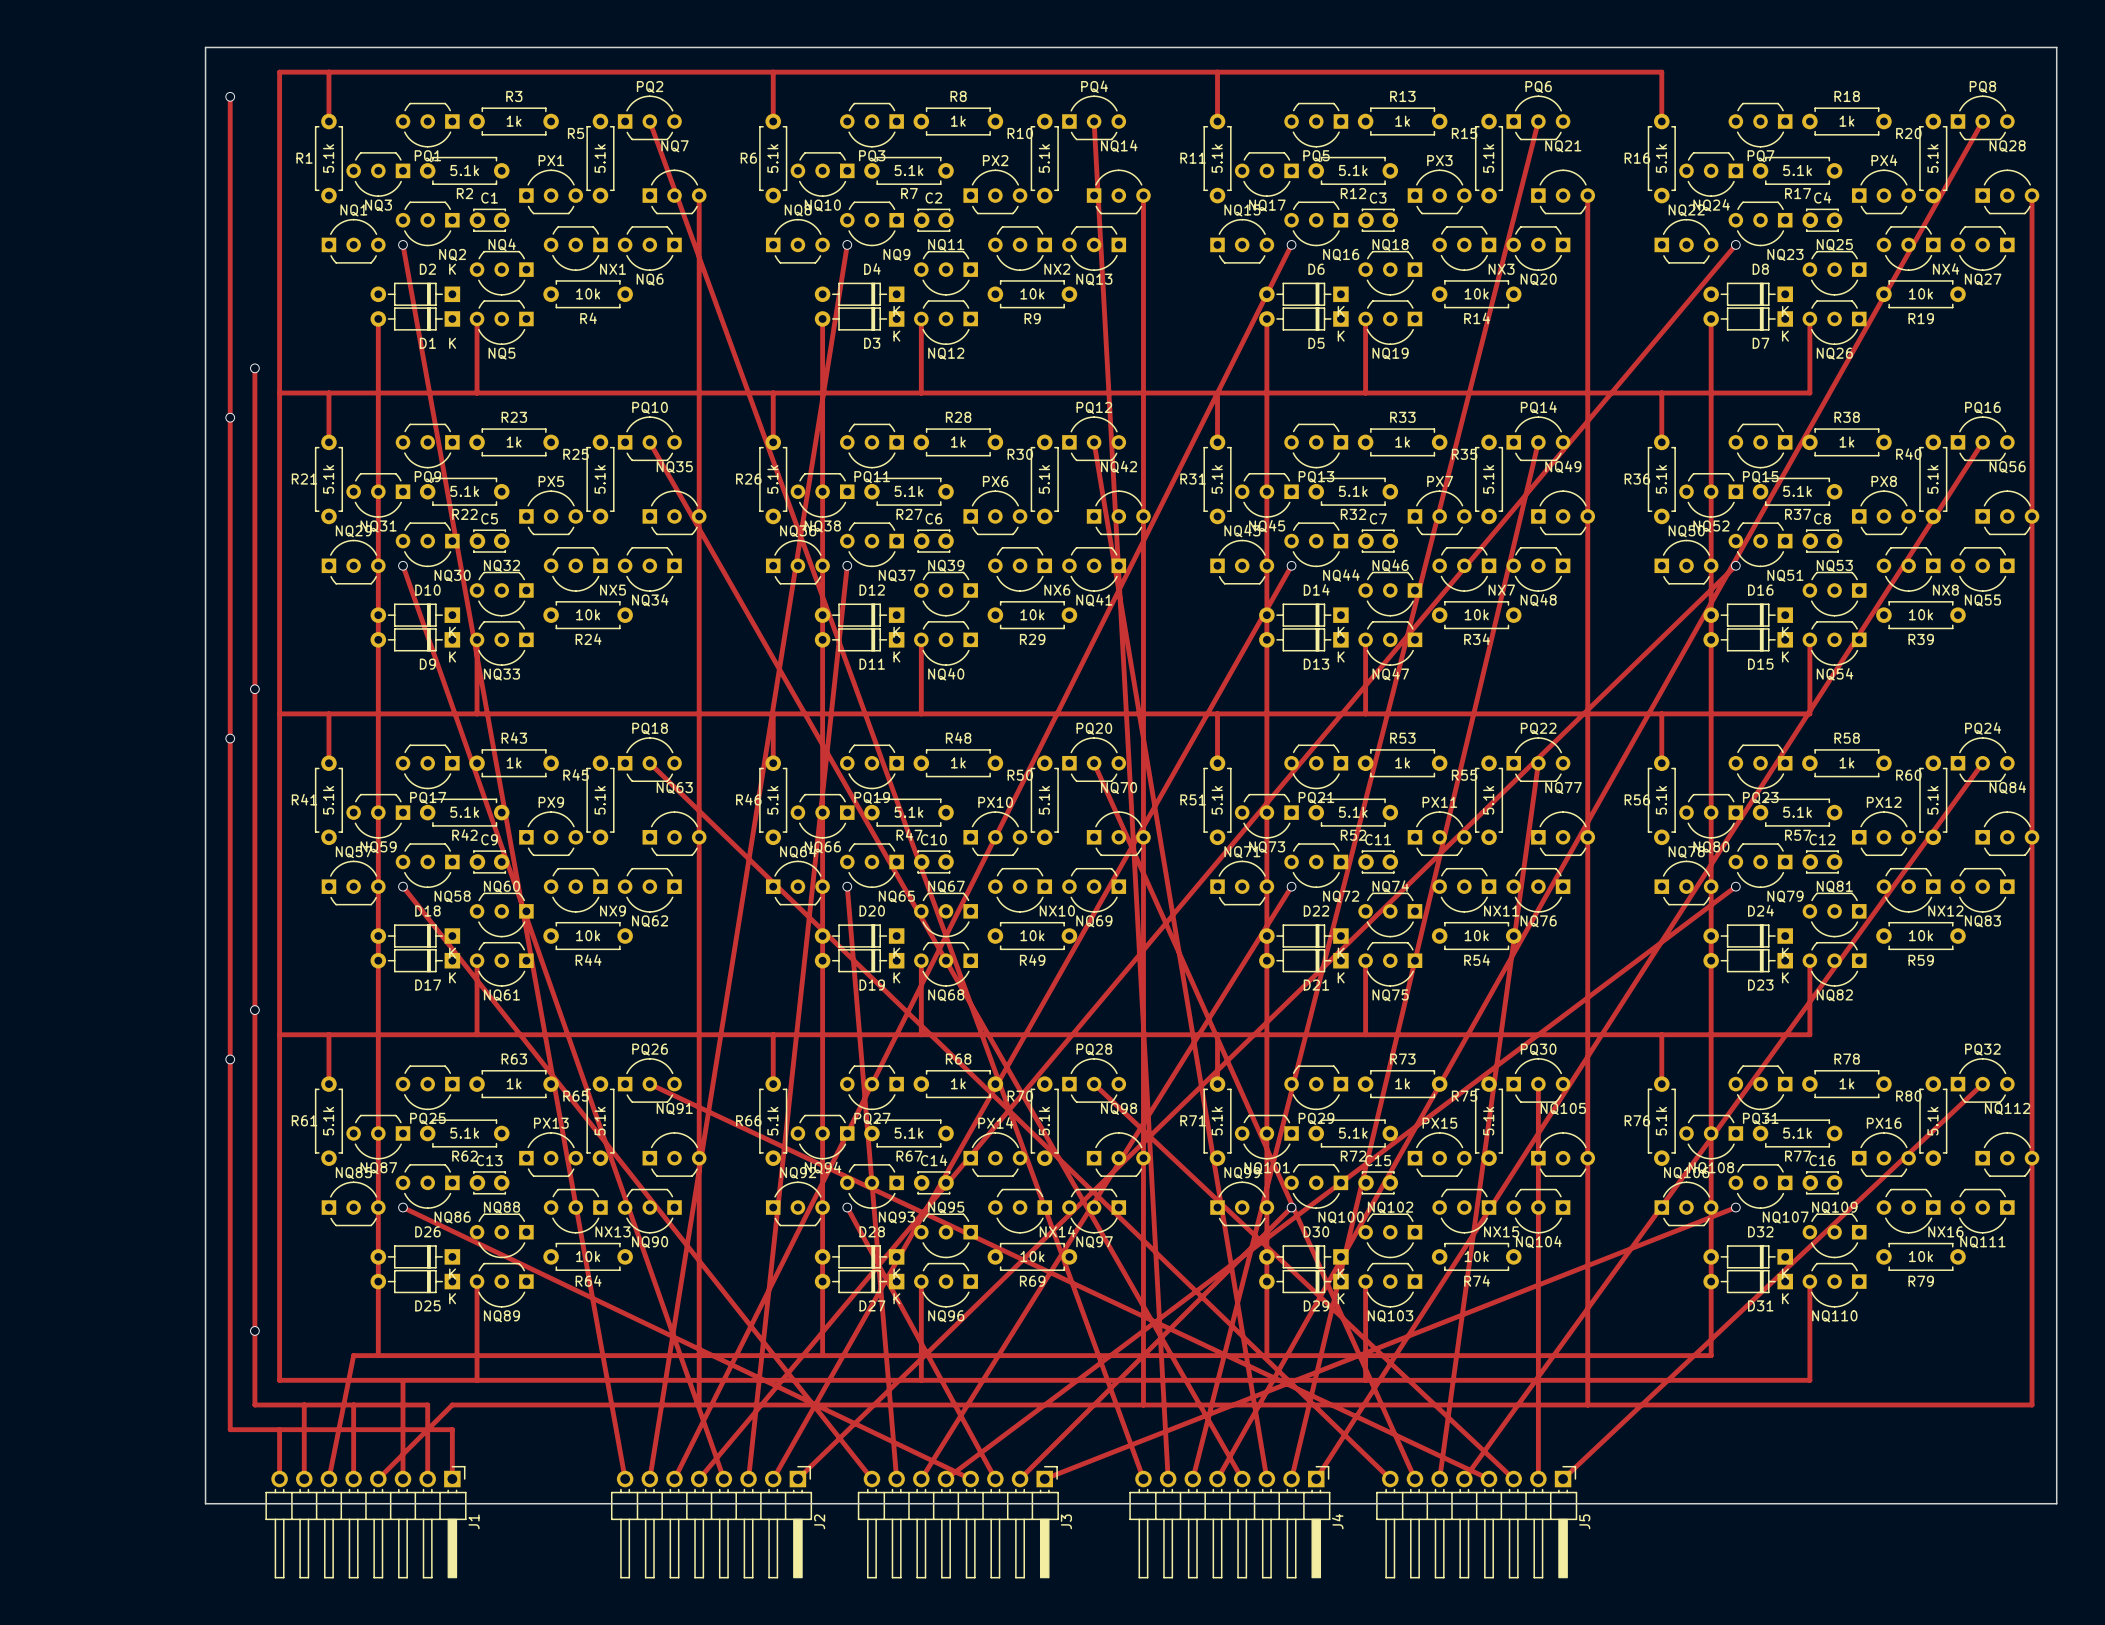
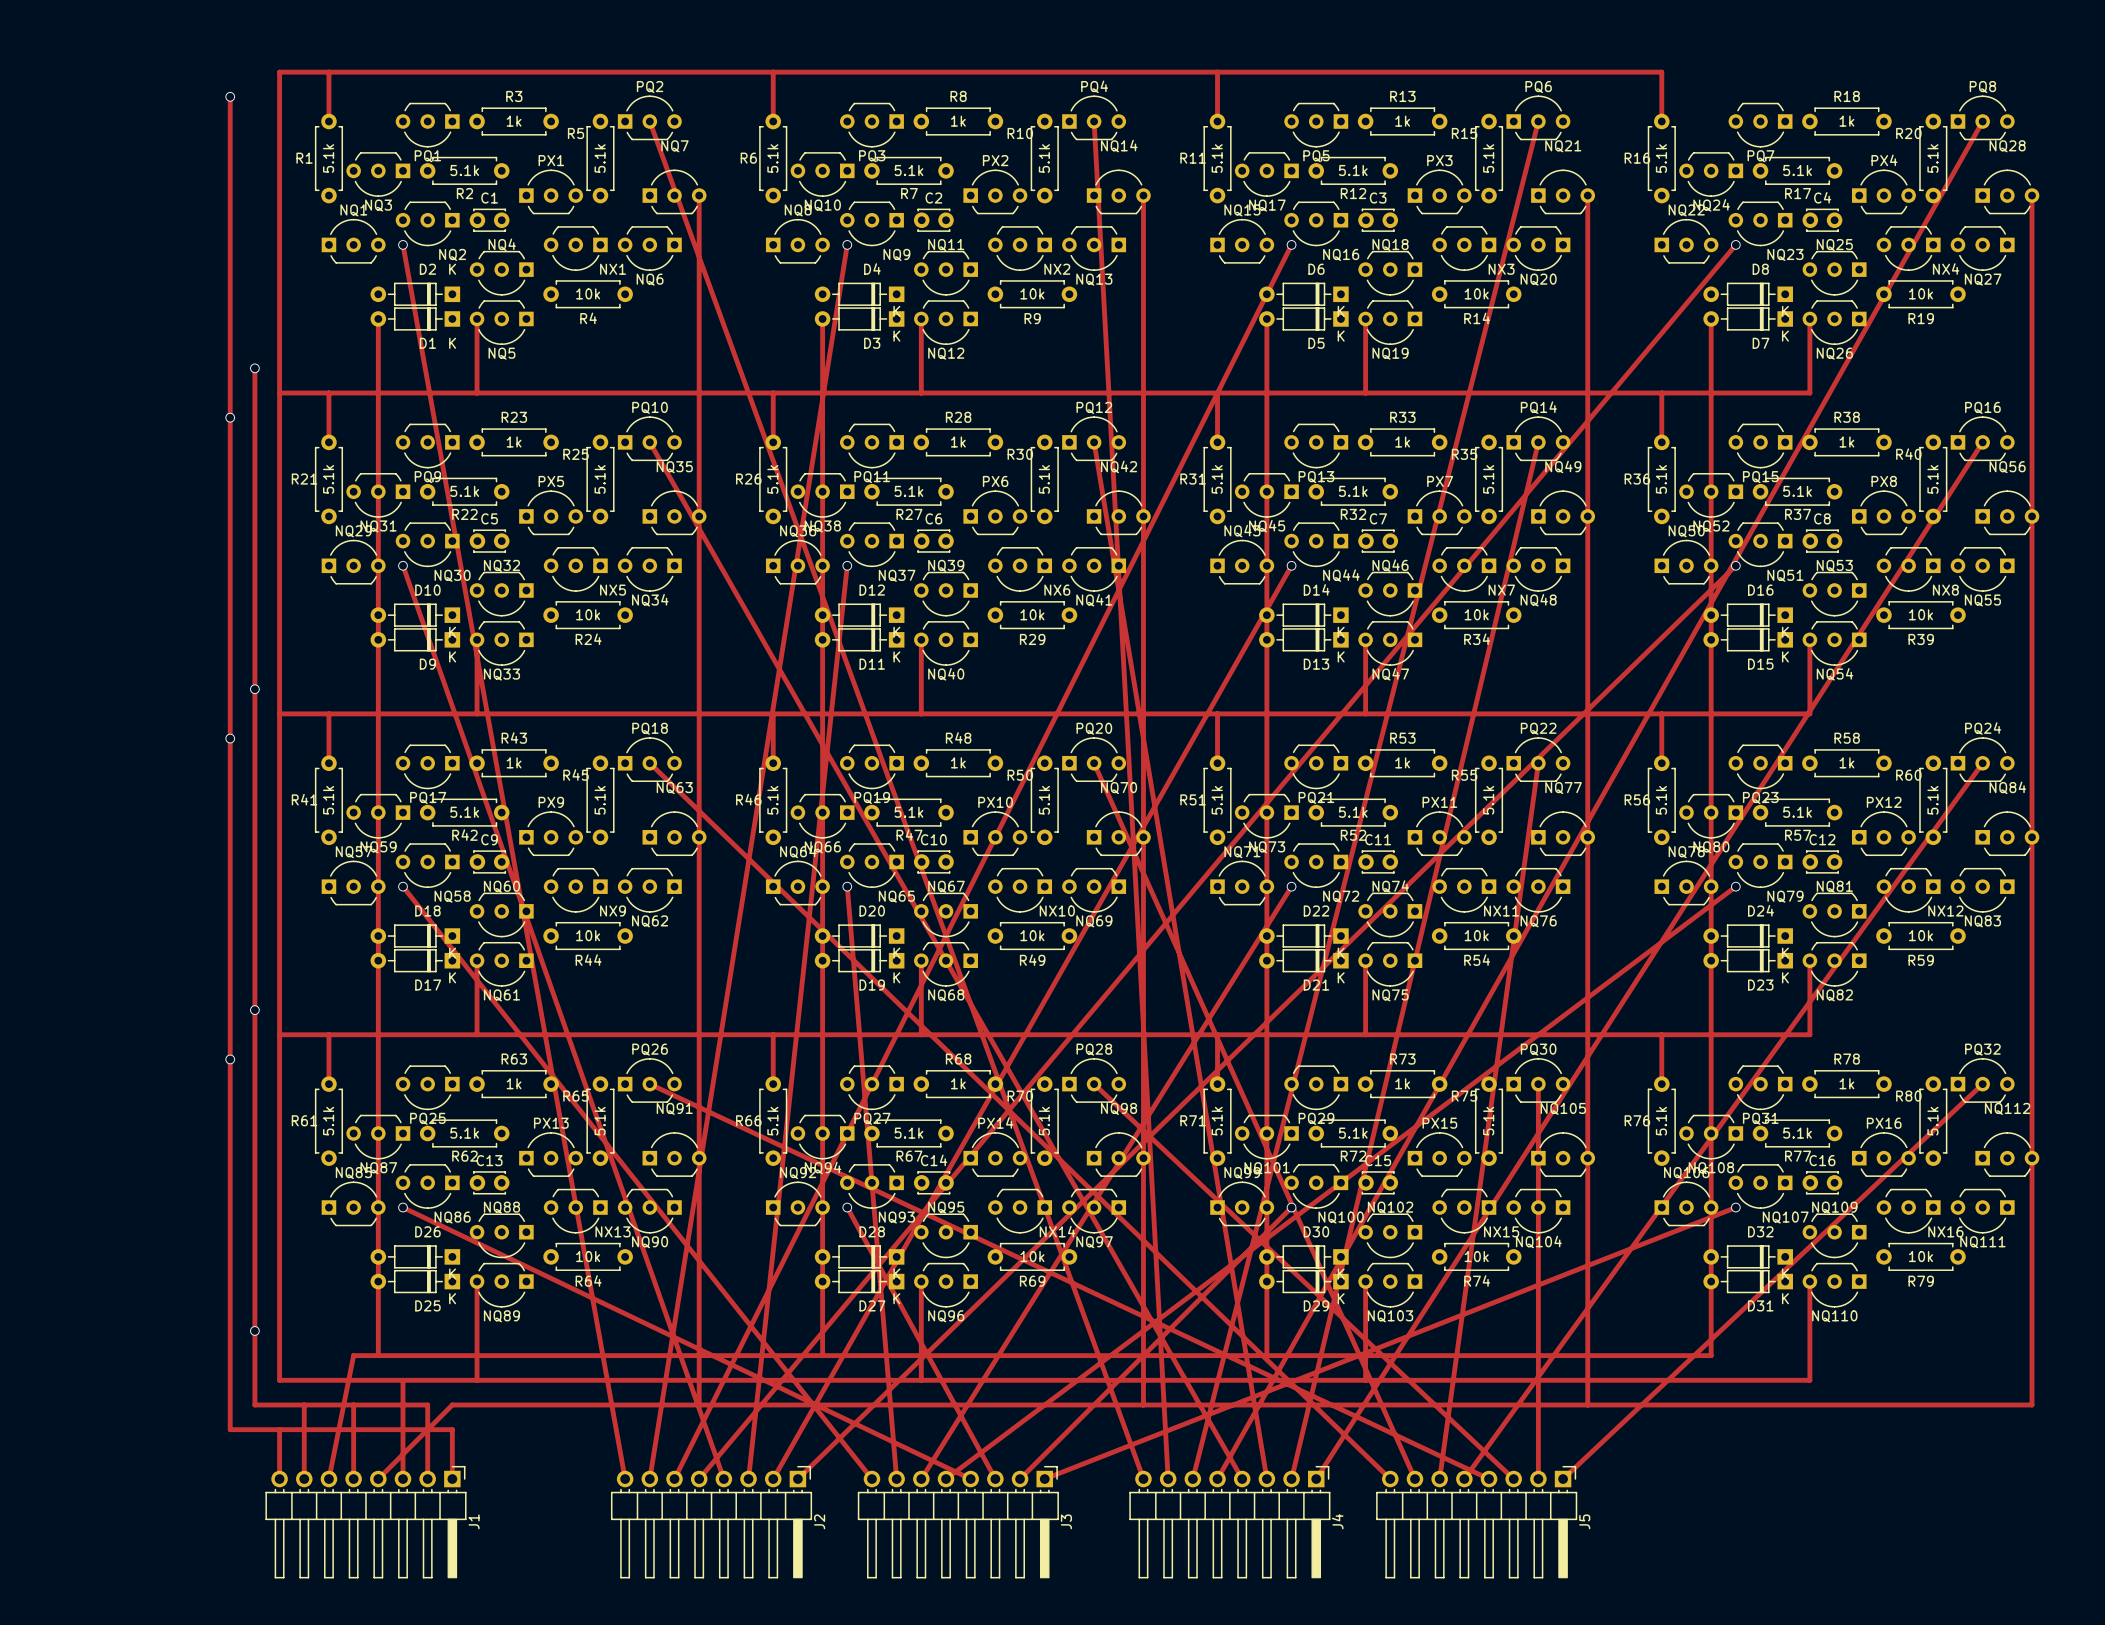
board edge: (205, 47) (2056, 47) (2056, 1503) (205, 1503) (205, 47) -> none

